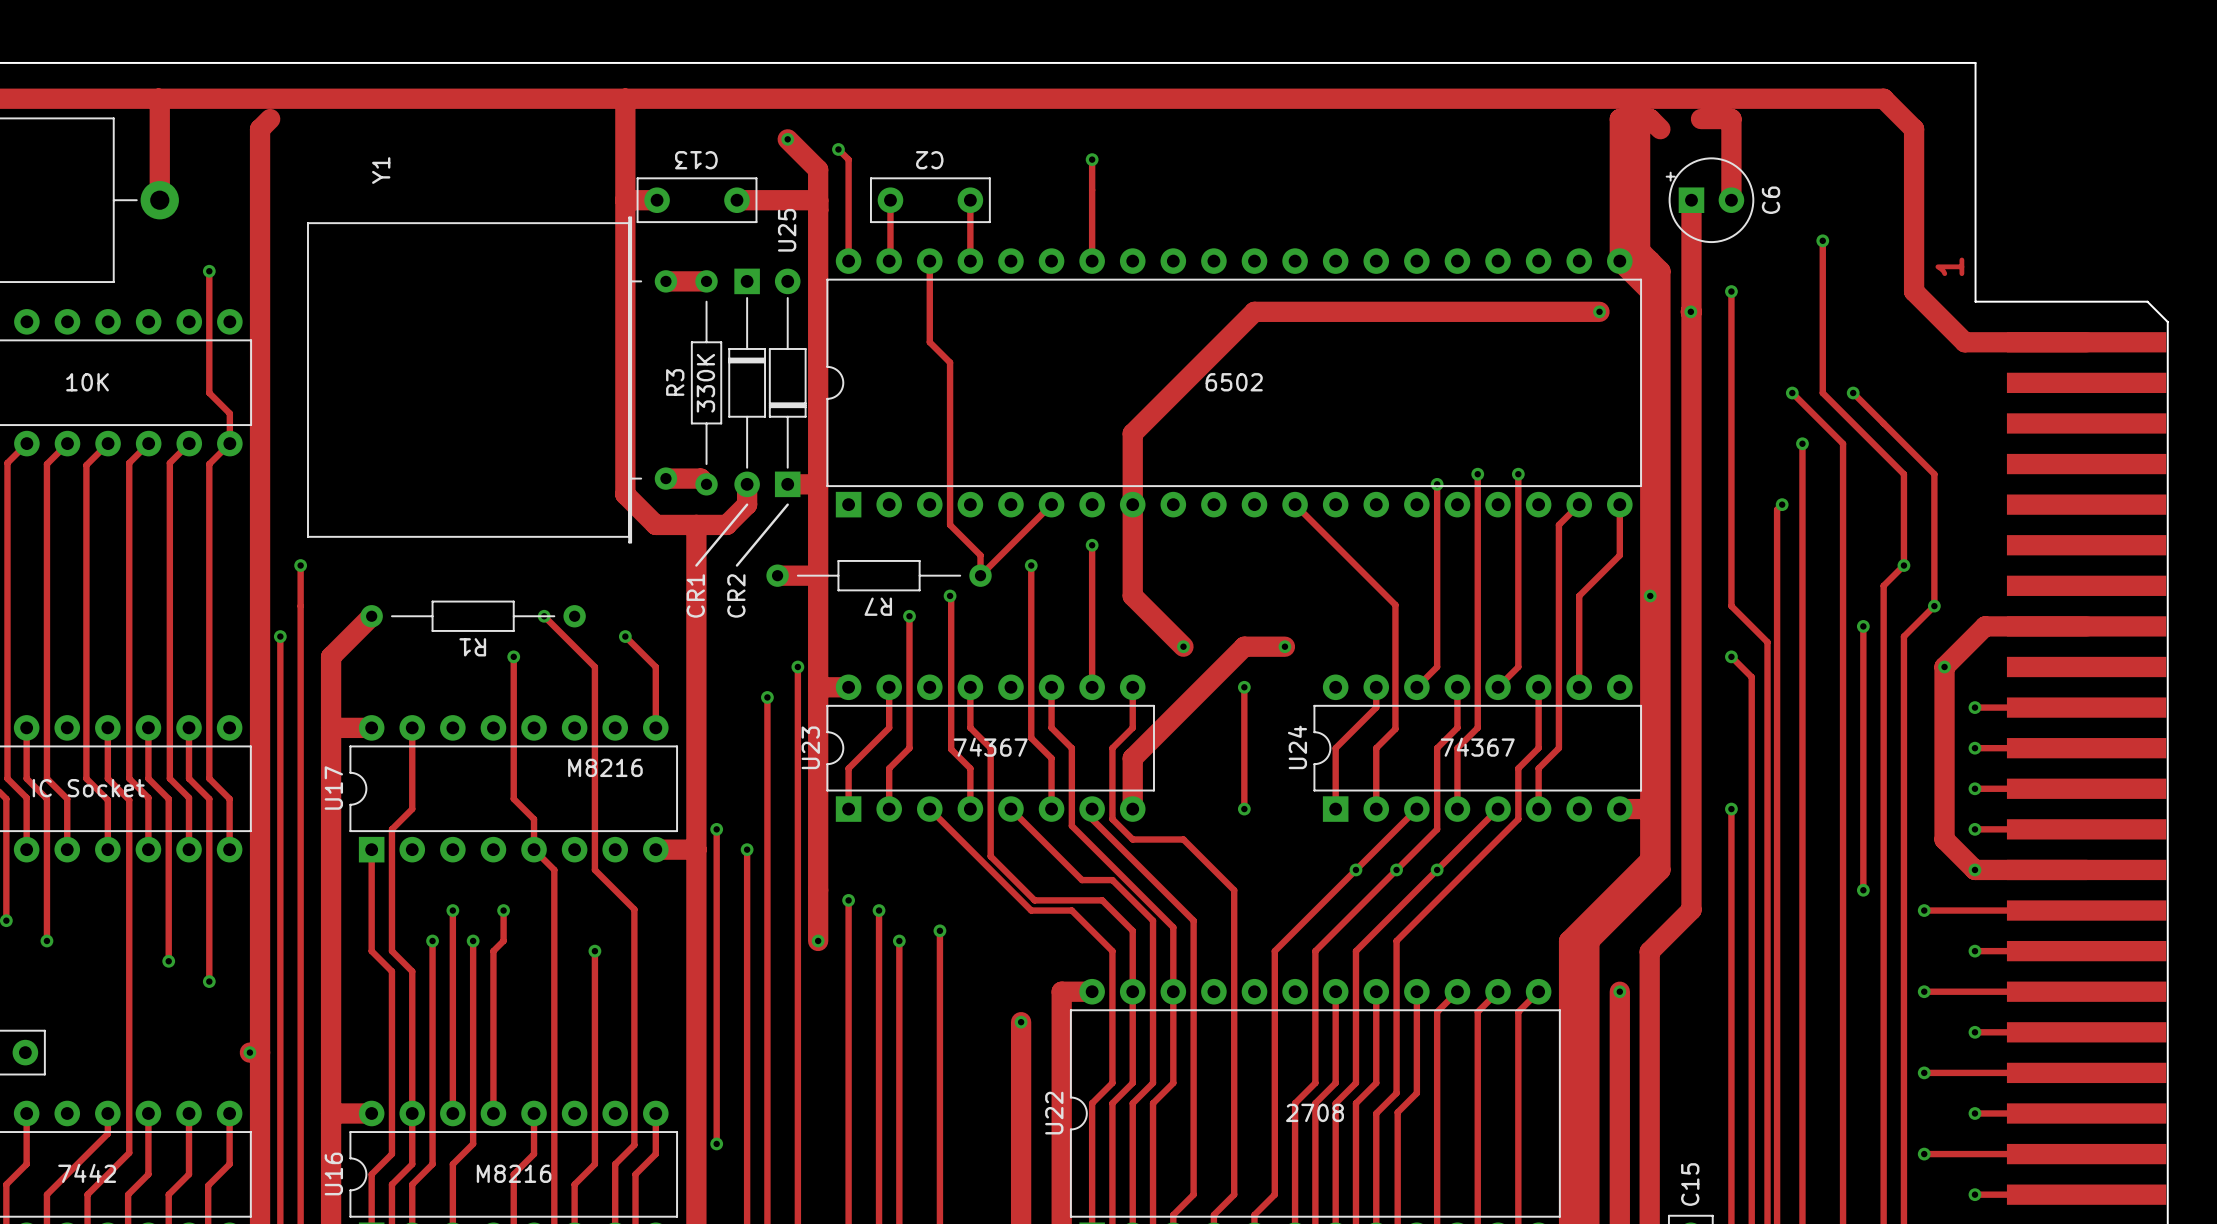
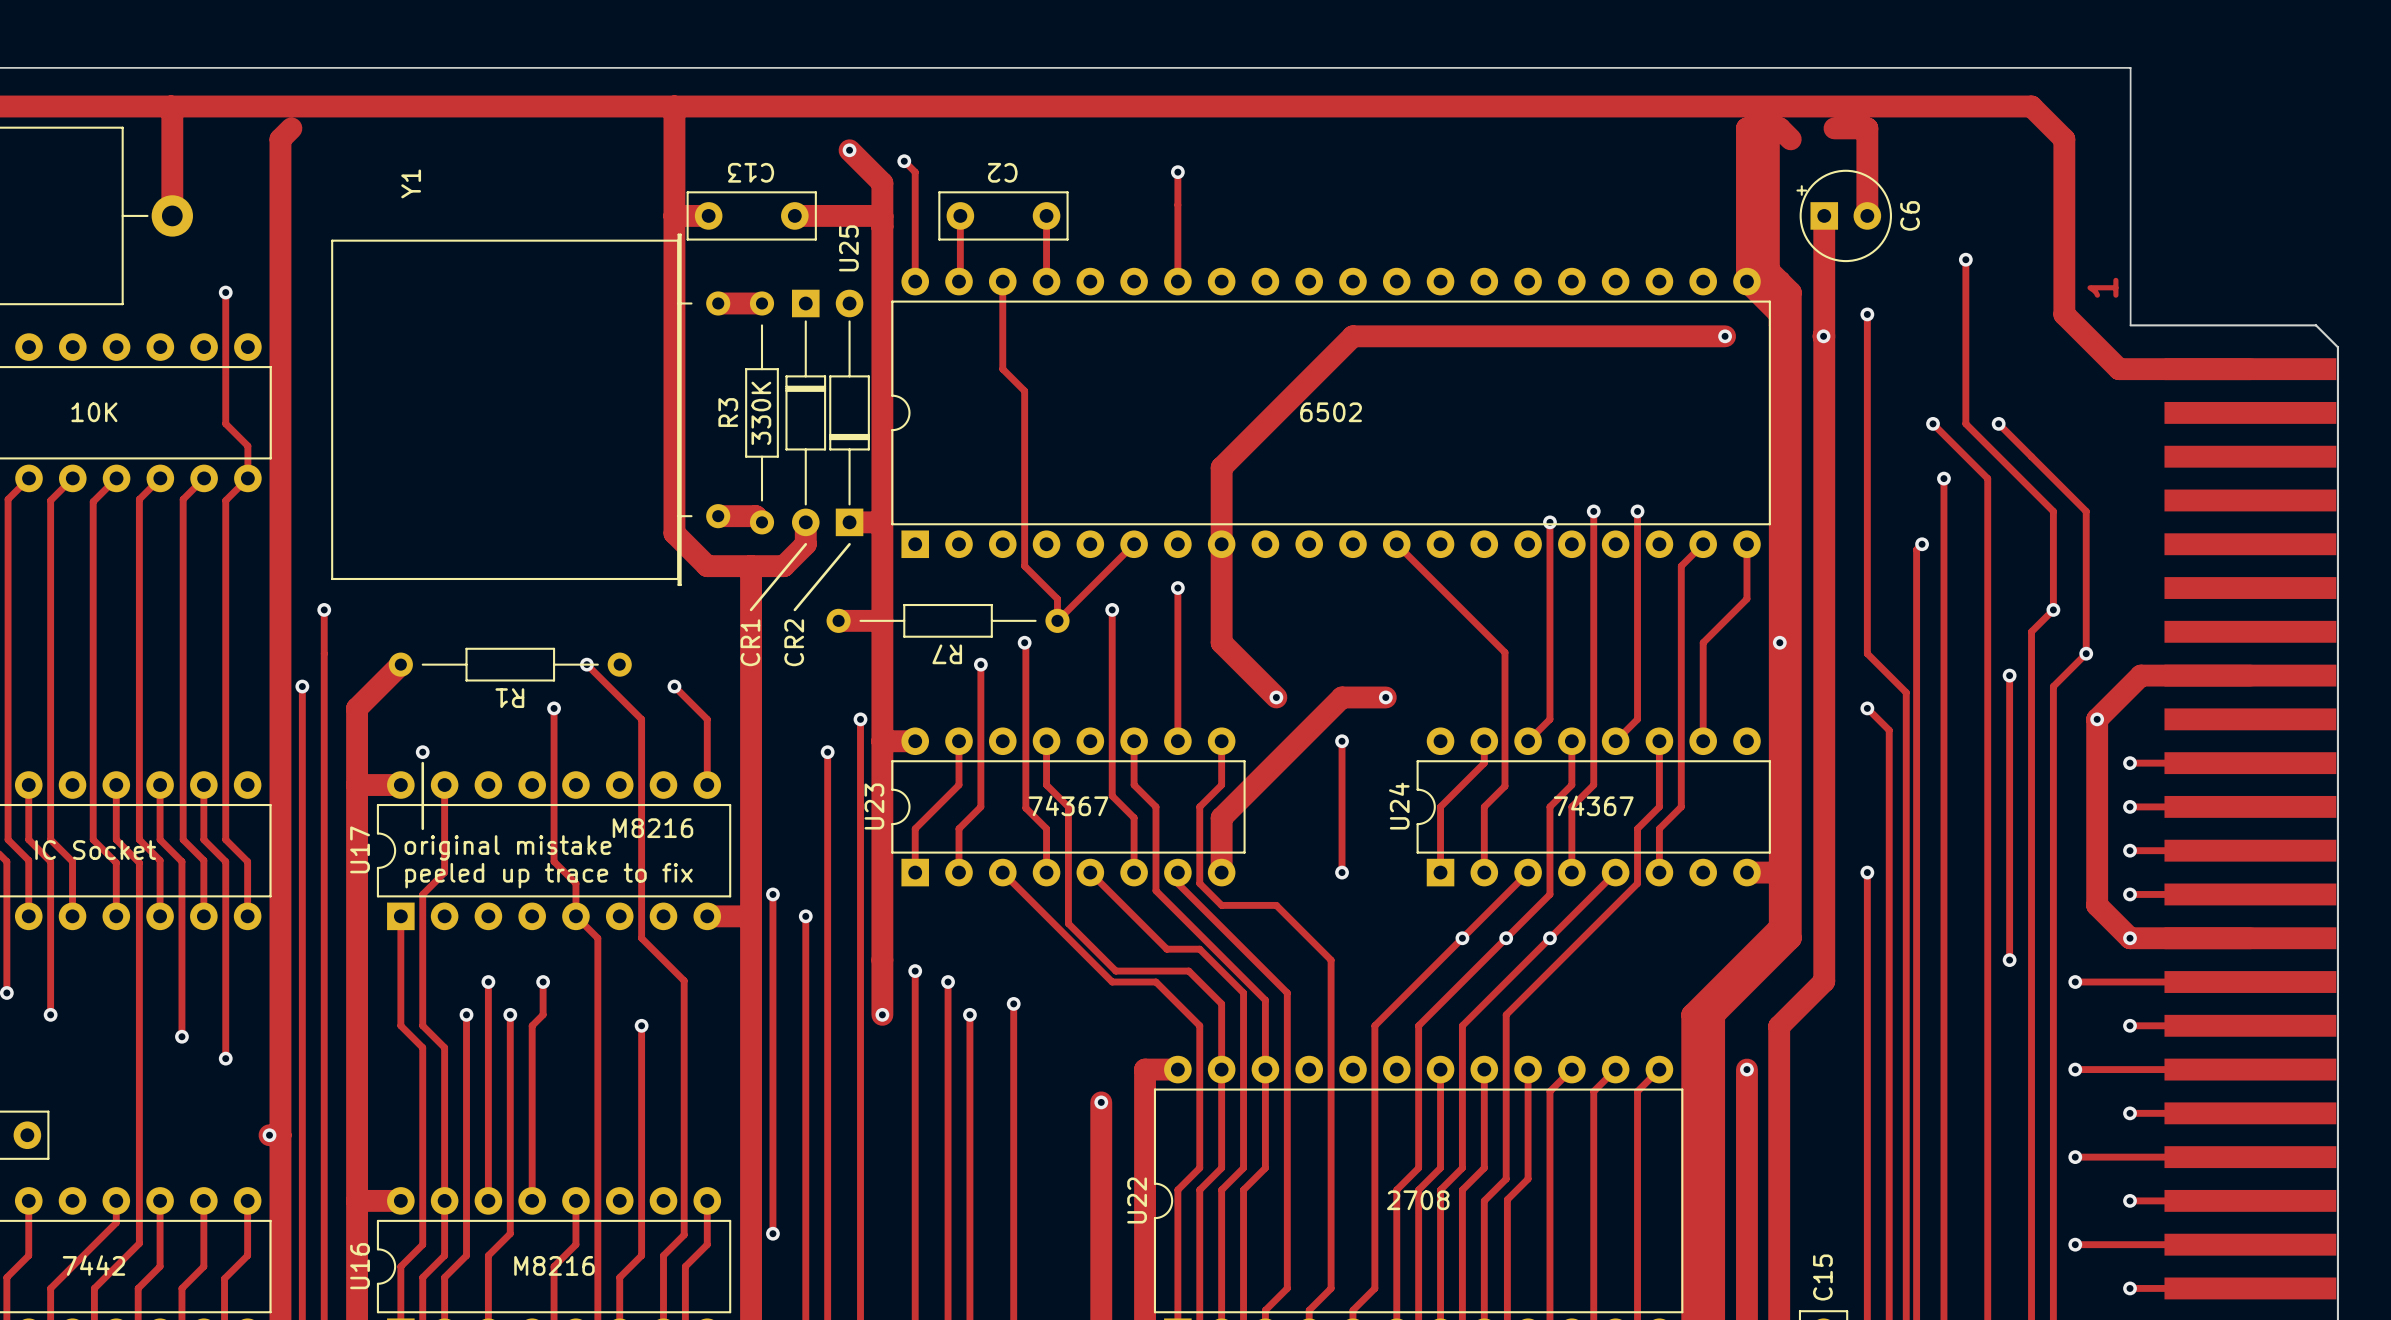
via: none -> (422, 752)
line: none -> (422, 763) (422, 828)
text: none -> original mistake (508, 847)
text: none -> peeled up trace to fix (549, 875)

